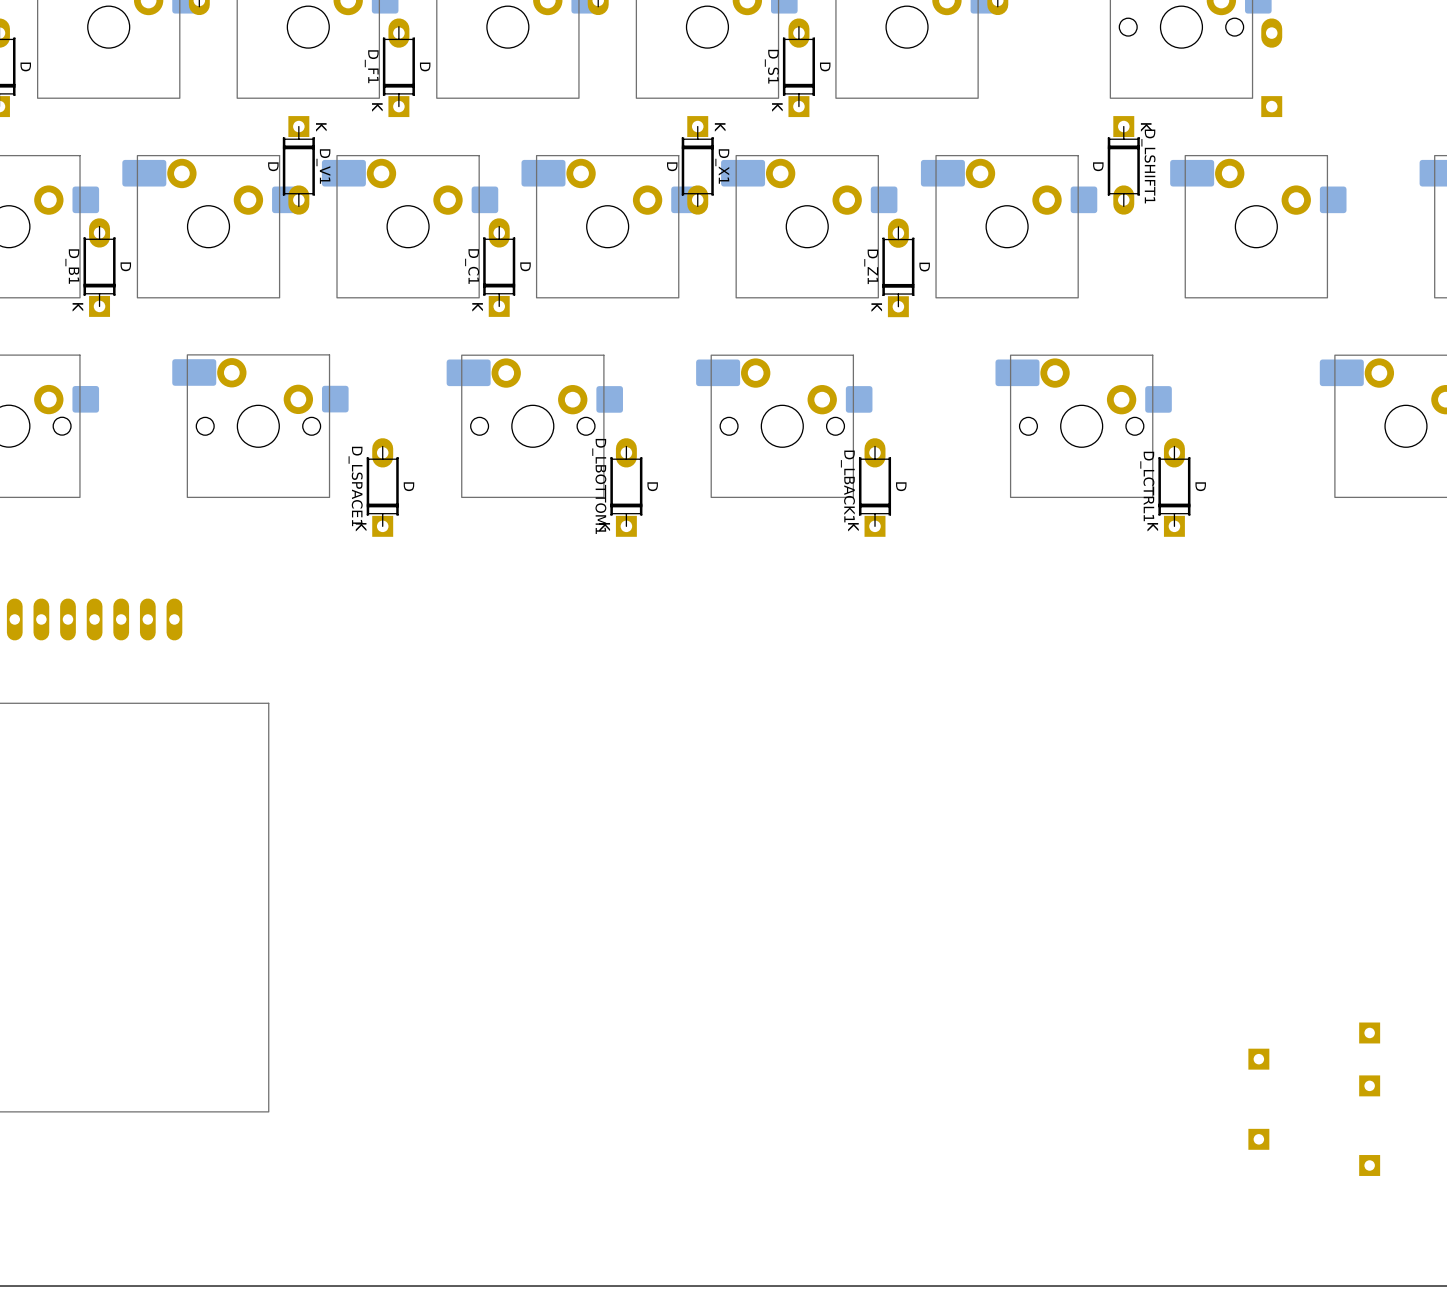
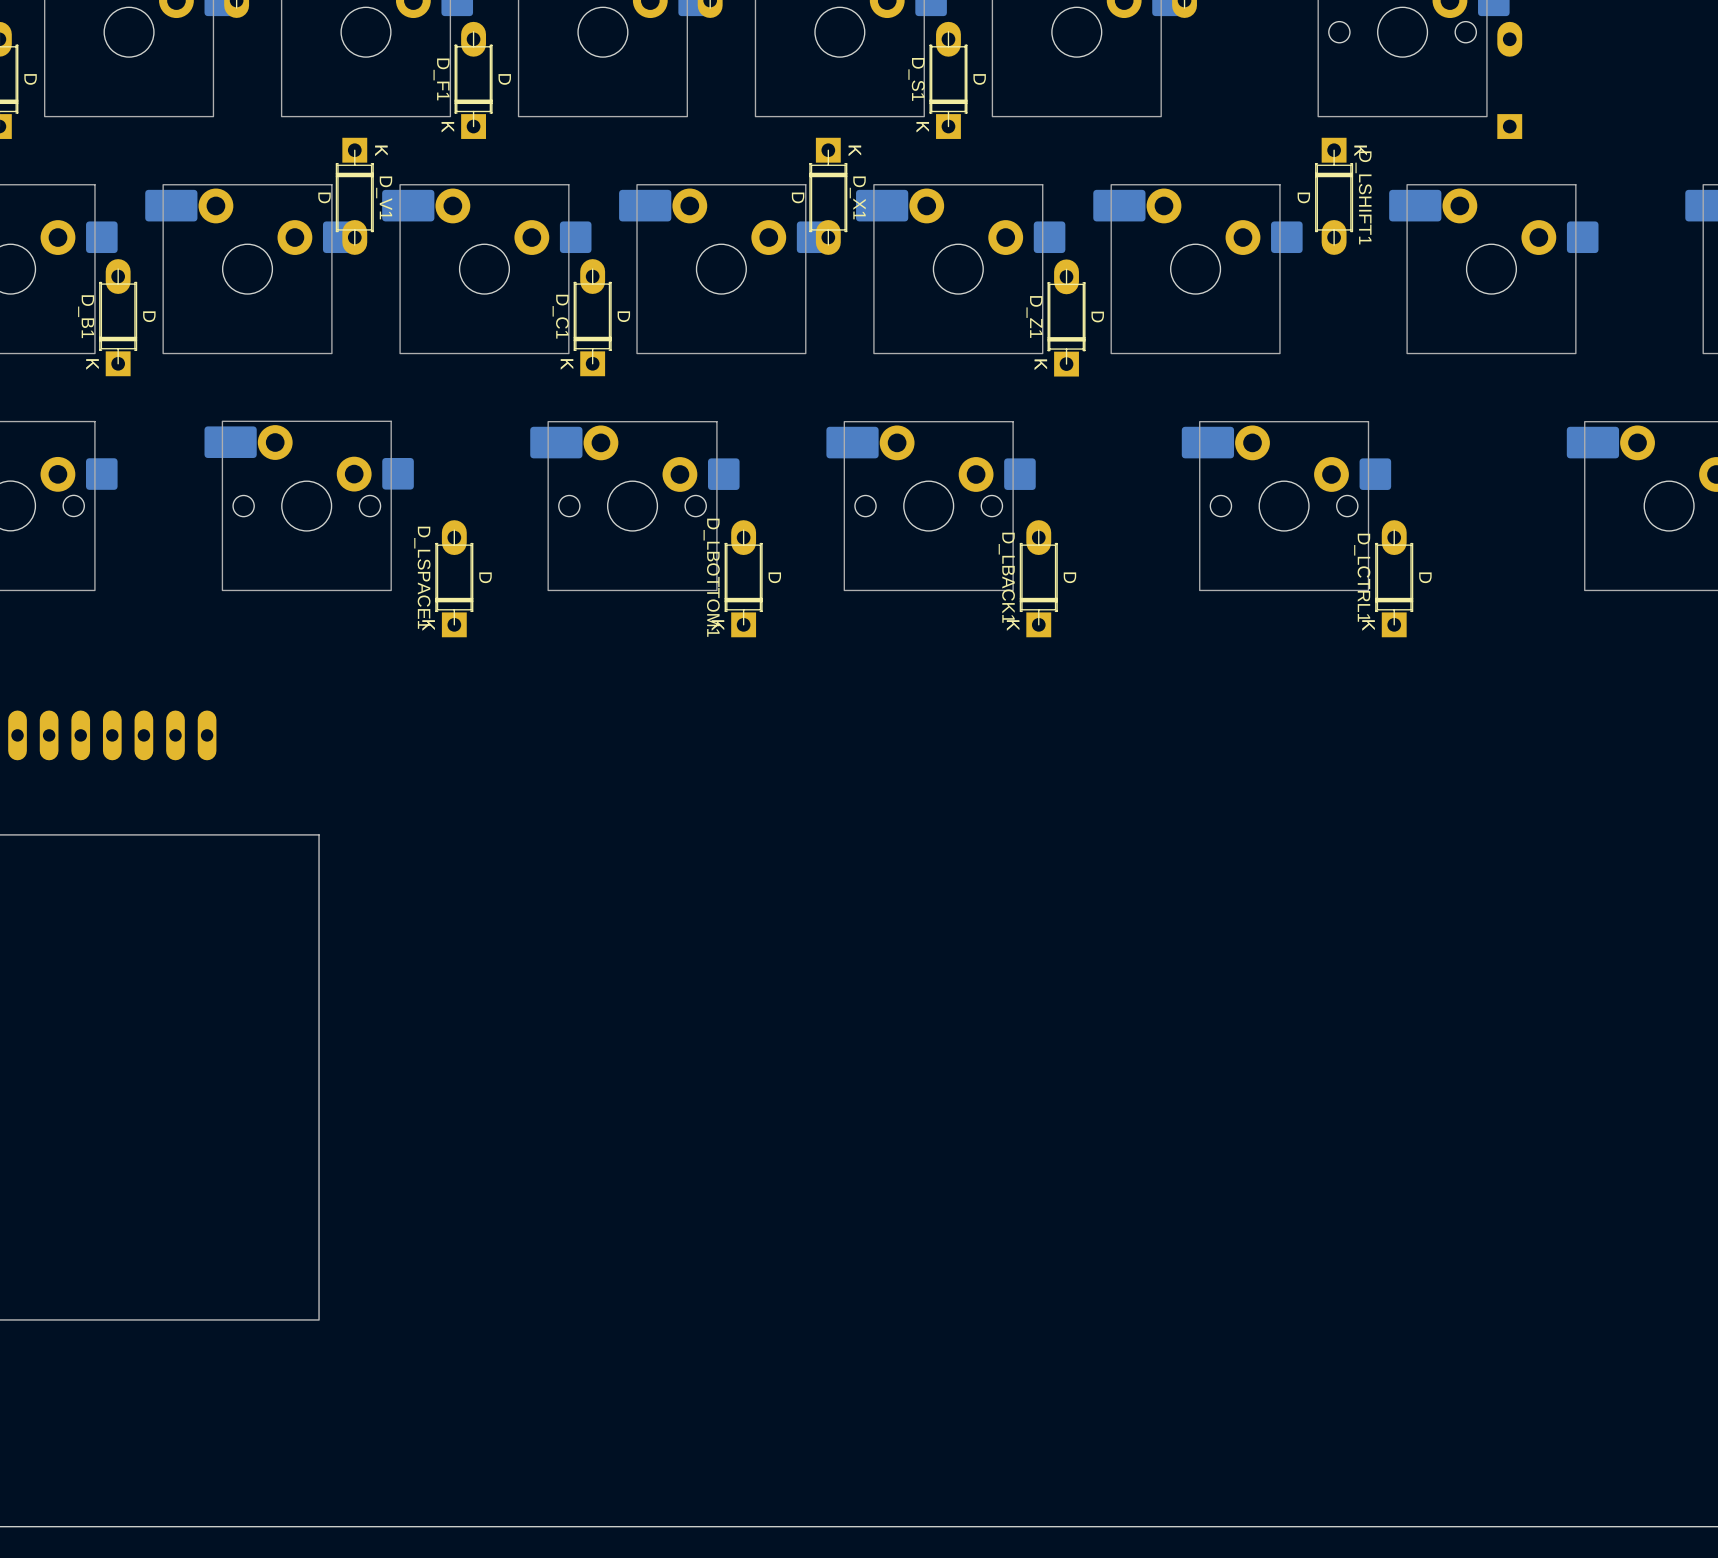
part: (1369, 1032) -> none
part: (1258, 1059) -> none
part: (1369, 1085) -> none
part: (1258, 1139) -> none
part: (1369, 1165) -> none

